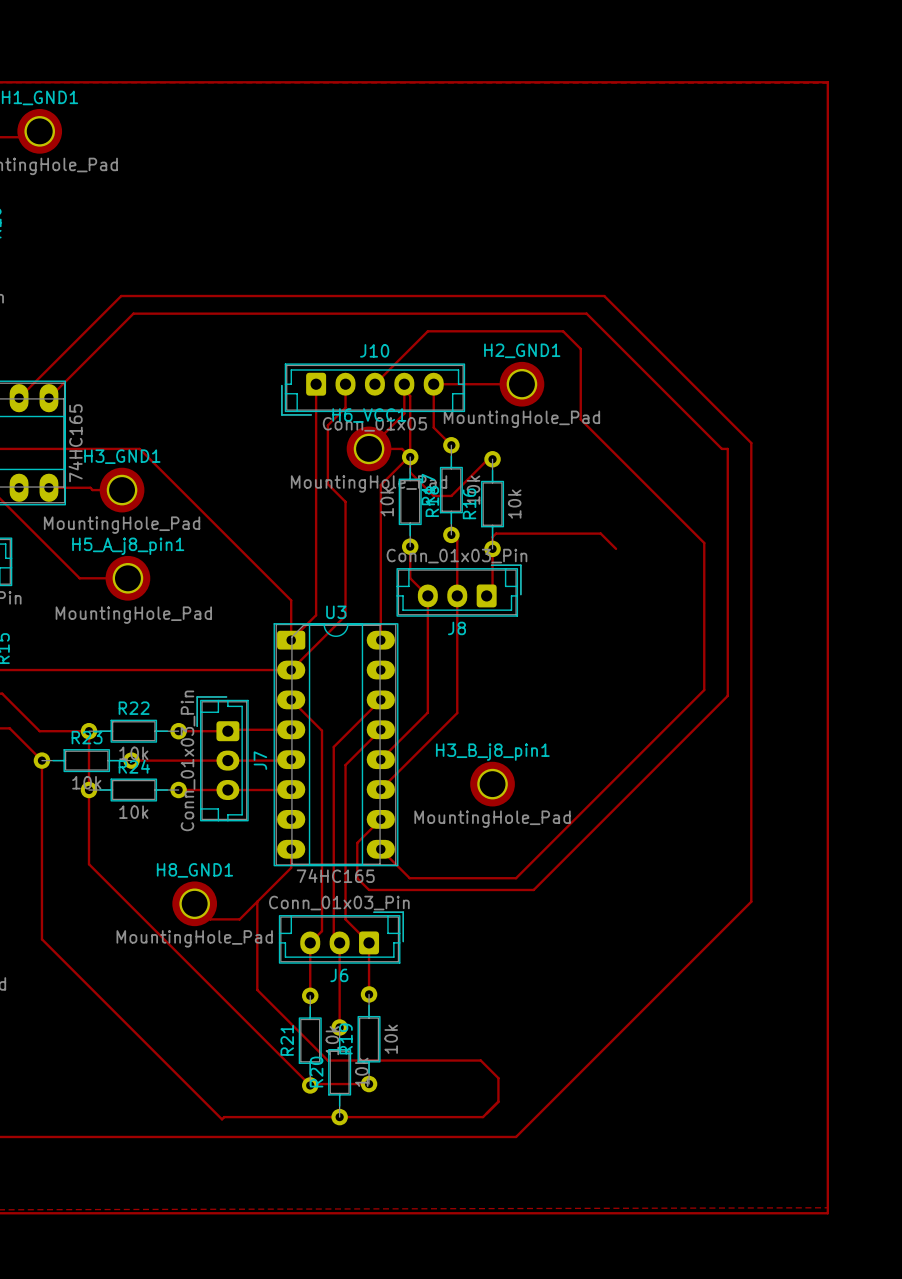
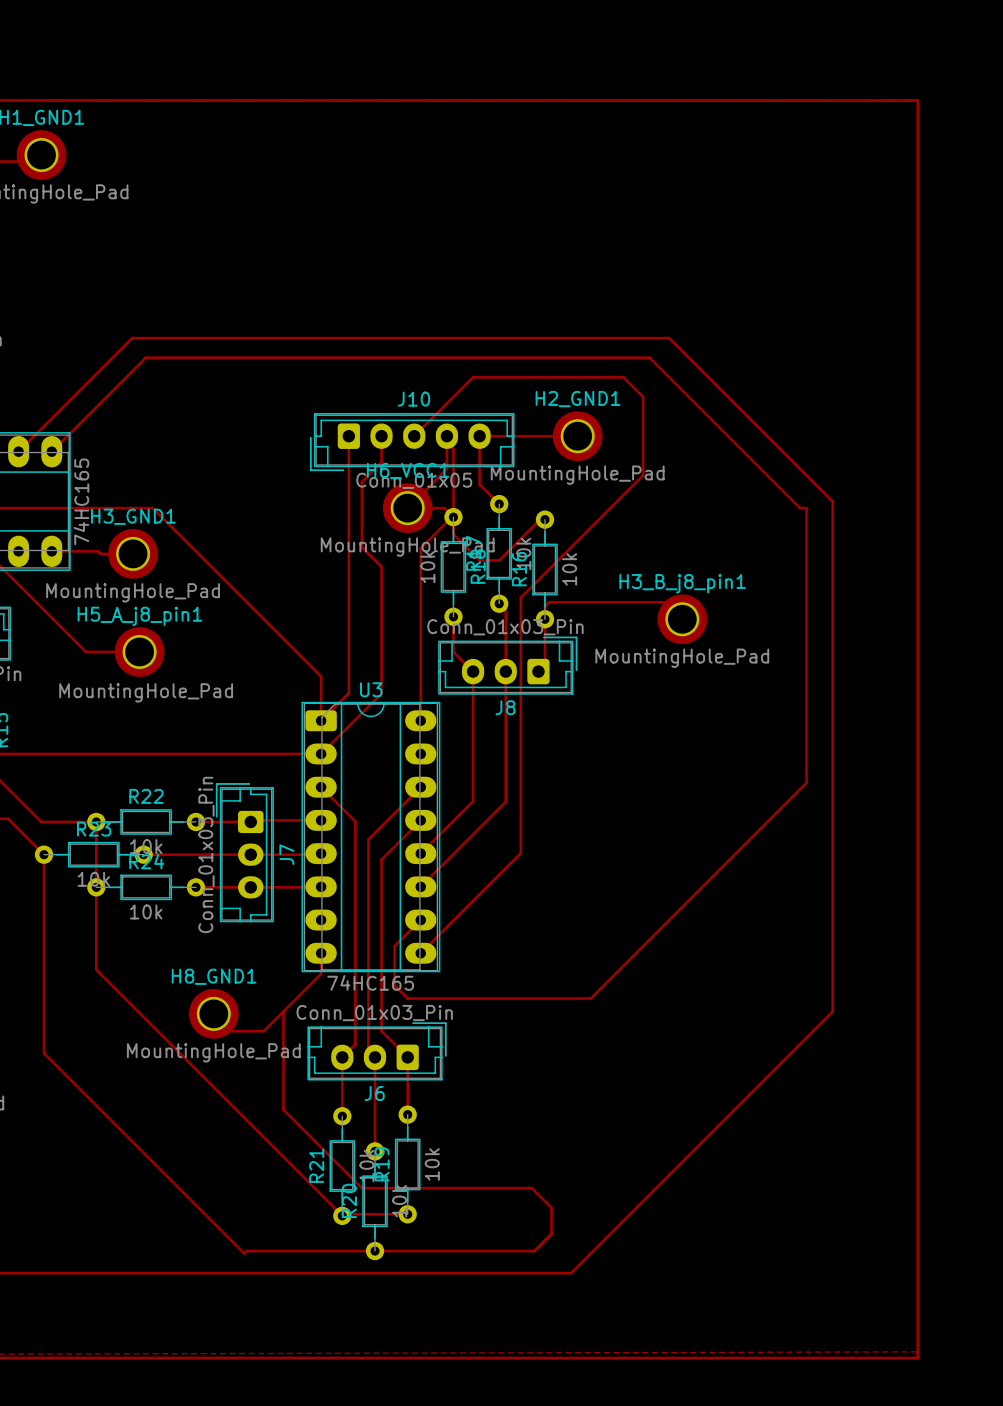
track: (580, 419) (704, 543) (704, 690) (516, 878) (409, 878) (380, 849) -> (643, 475) (520, 597) (520, 853) (420, 953)
H3_B_j8_pin1 position: (492, 784) -> (682, 619)

